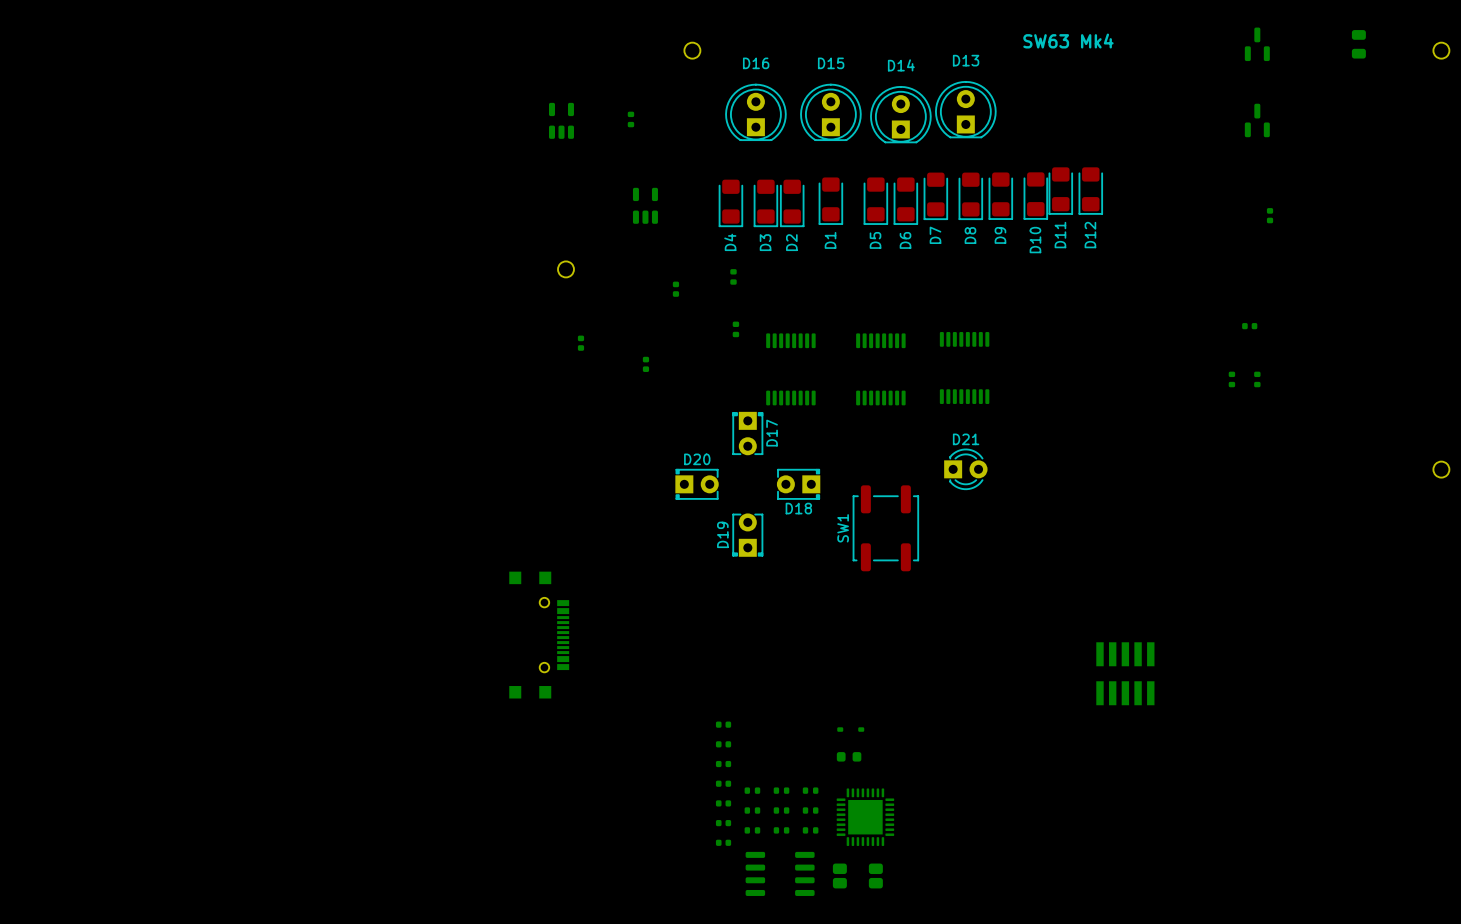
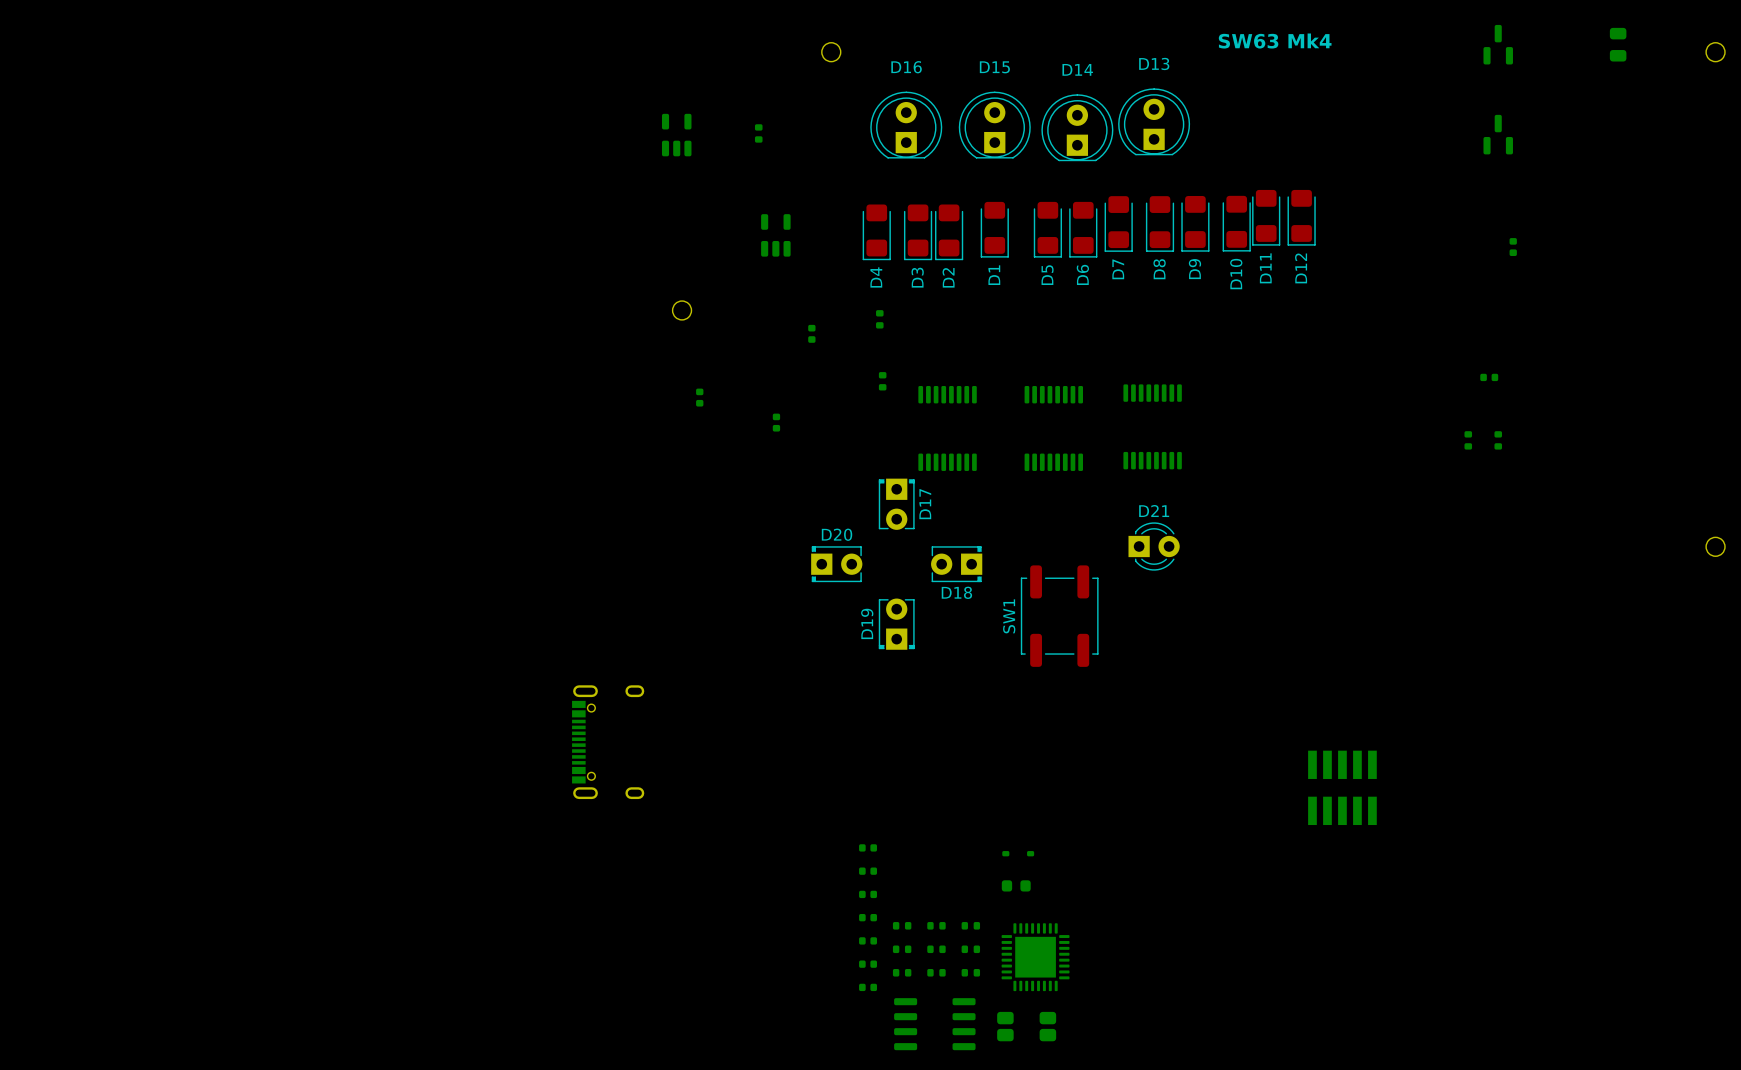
part: none -> (608, 742)
part: (539, 635) -> none

